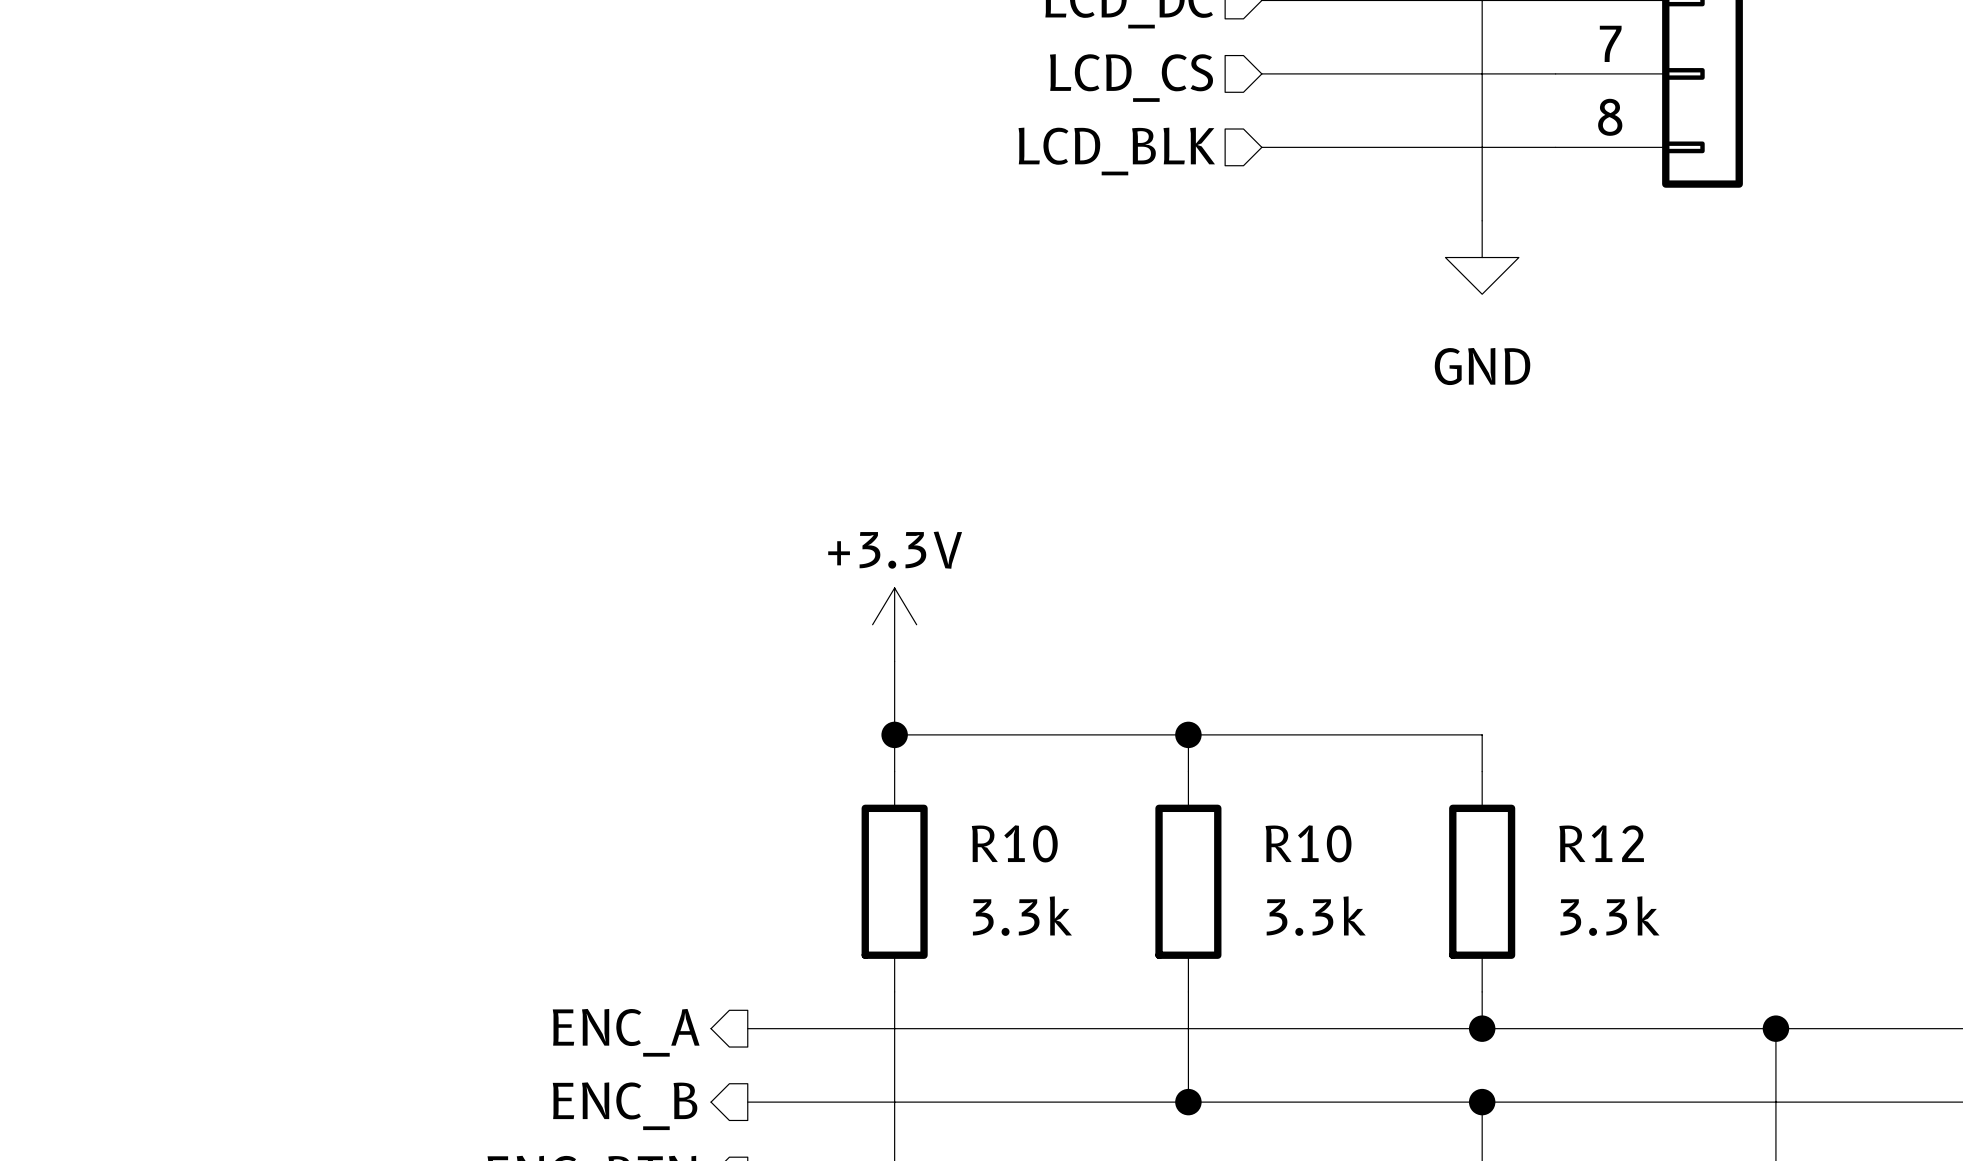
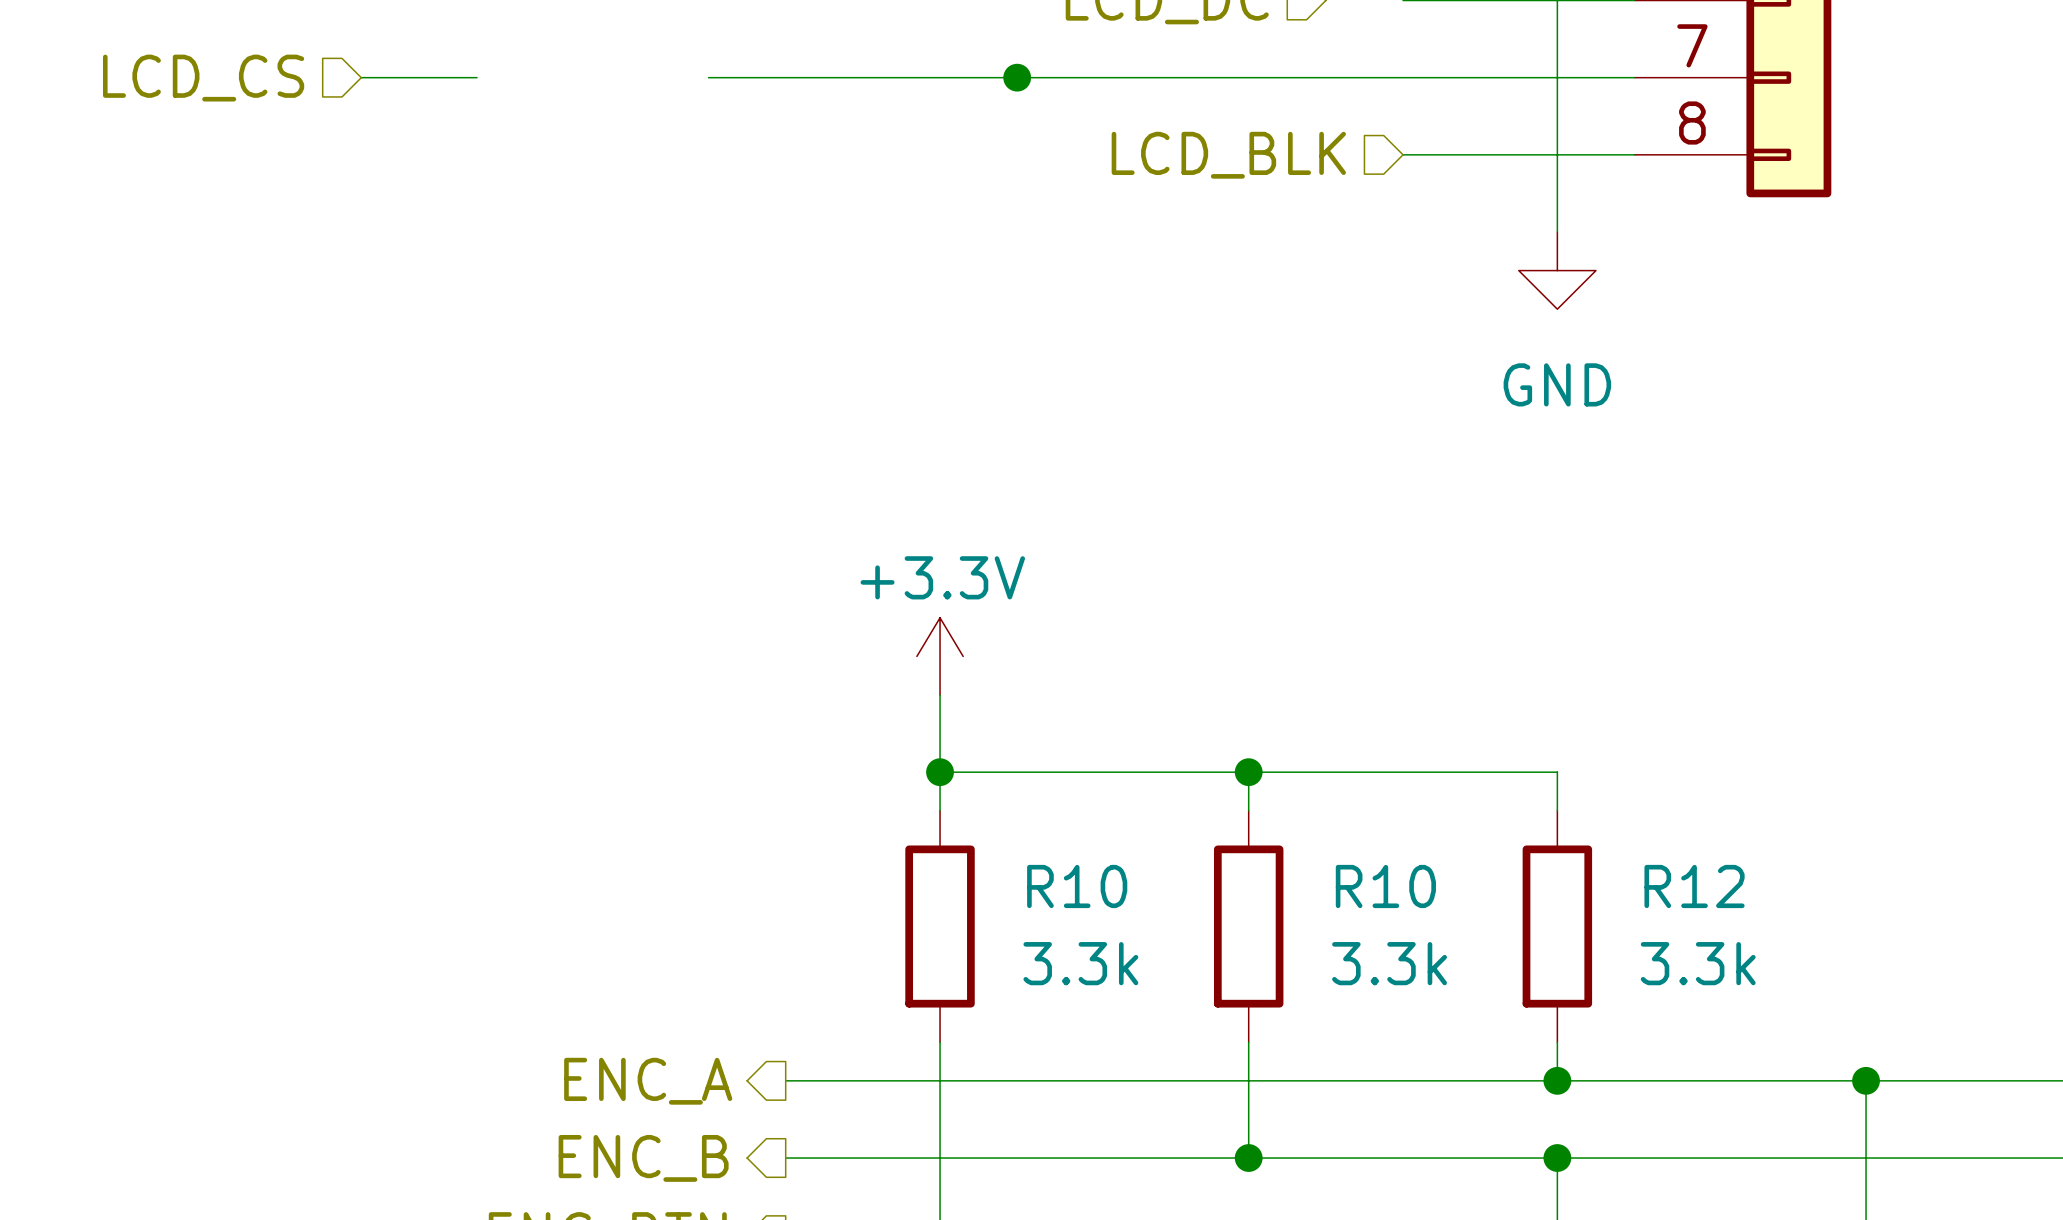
wire: (1261, 0) (1335, 0) -> none
wire: none -> (361, 77) (477, 77)
wire: none -> (708, 77) (1325, 77)
junction: none -> (1017, 77)
hierarchical label: none -> LCD_CS (203, 78)
hierarchical label: LCD_CS (1131, 78) -> none
wire: (1261, 147) (1335, 147) -> none
hierarchical label position: LCD_BLK (1116, 151) -> LCD_BLK (1228, 155)

